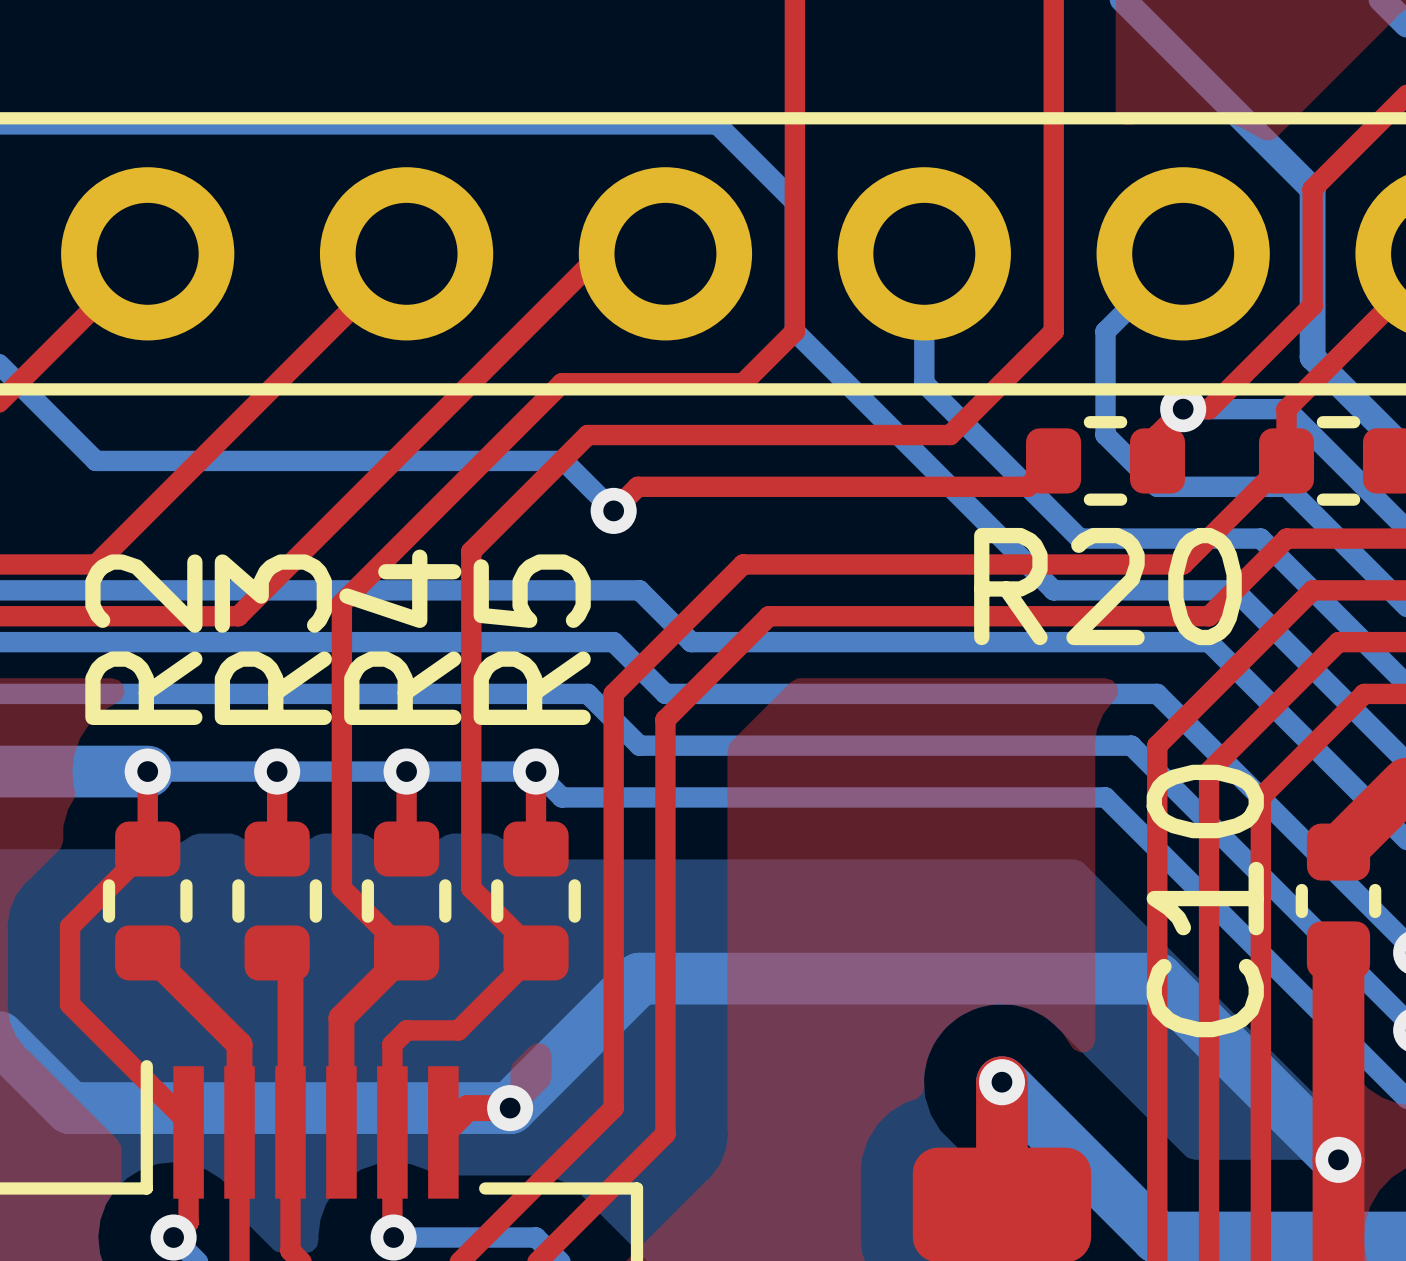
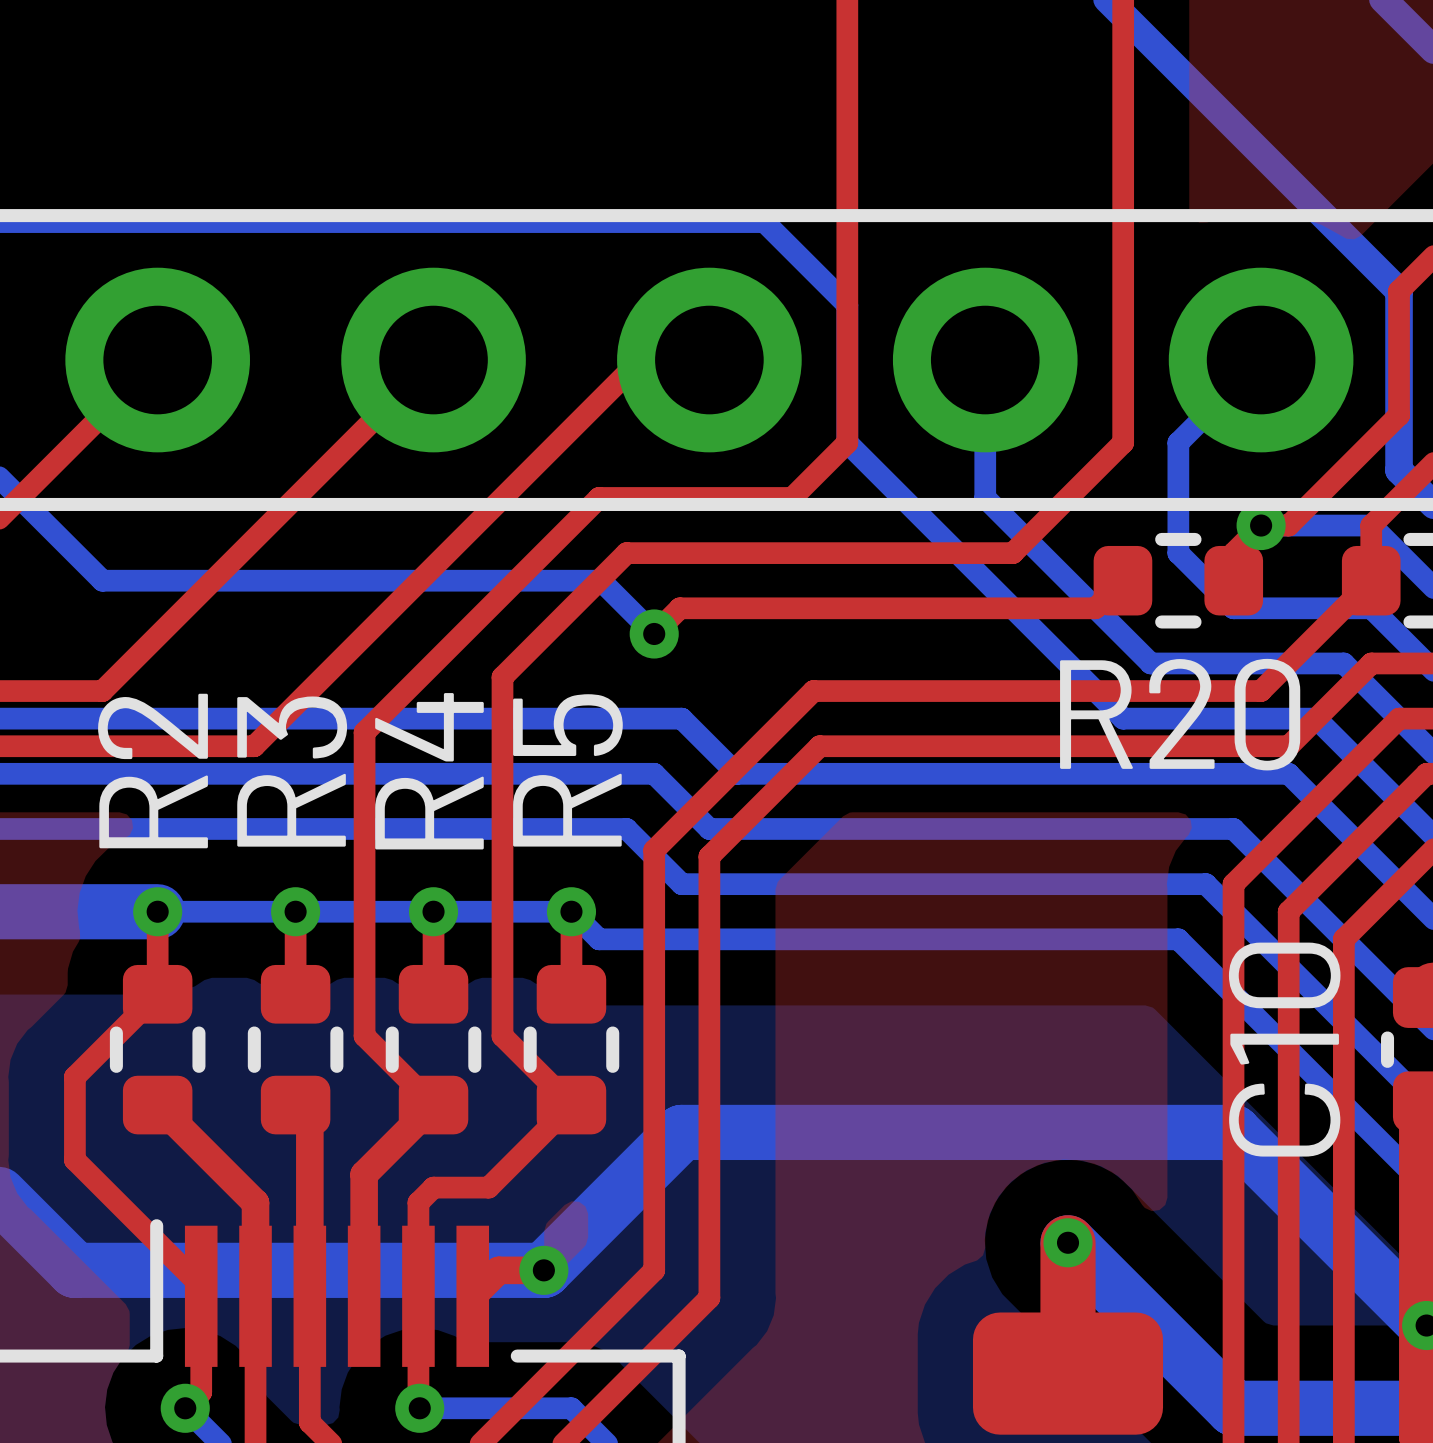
top track: (763, 564) (743, 564) (613, 693) (613, 713) -> (813, 691) (654, 850)

